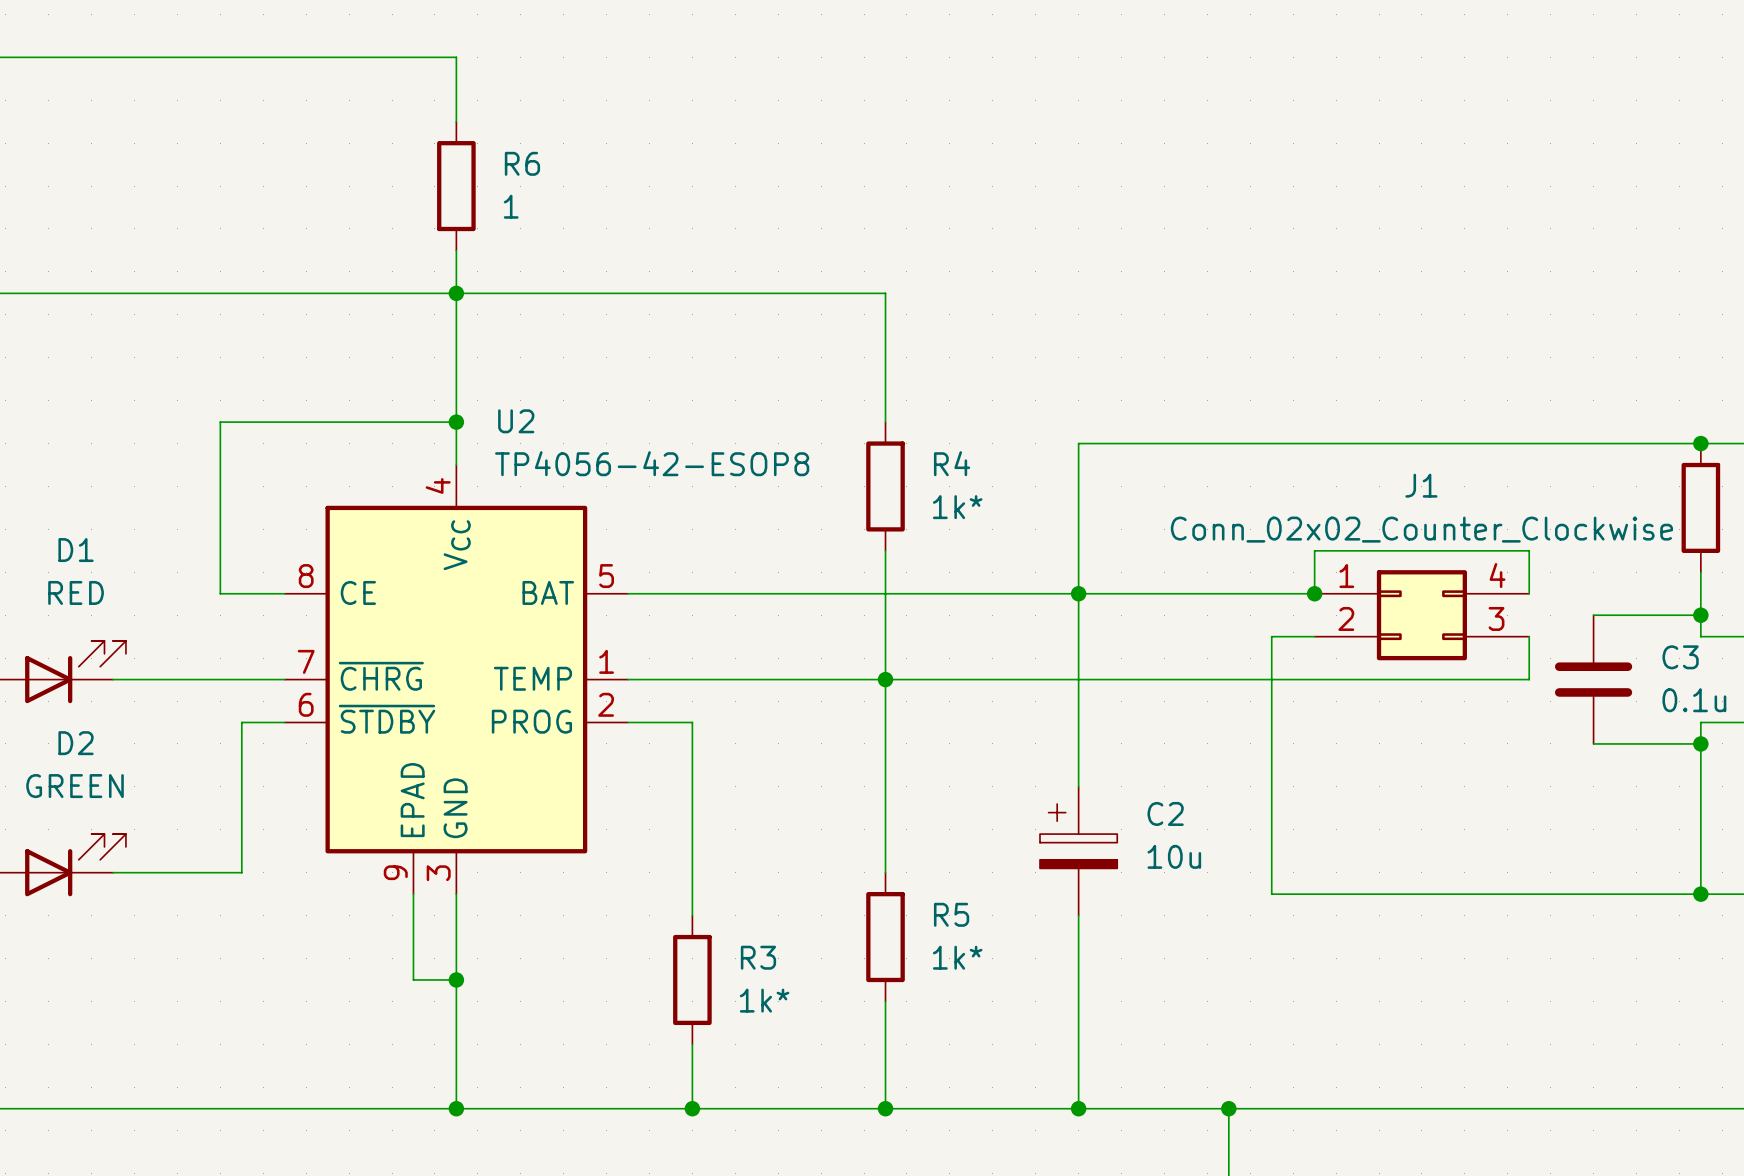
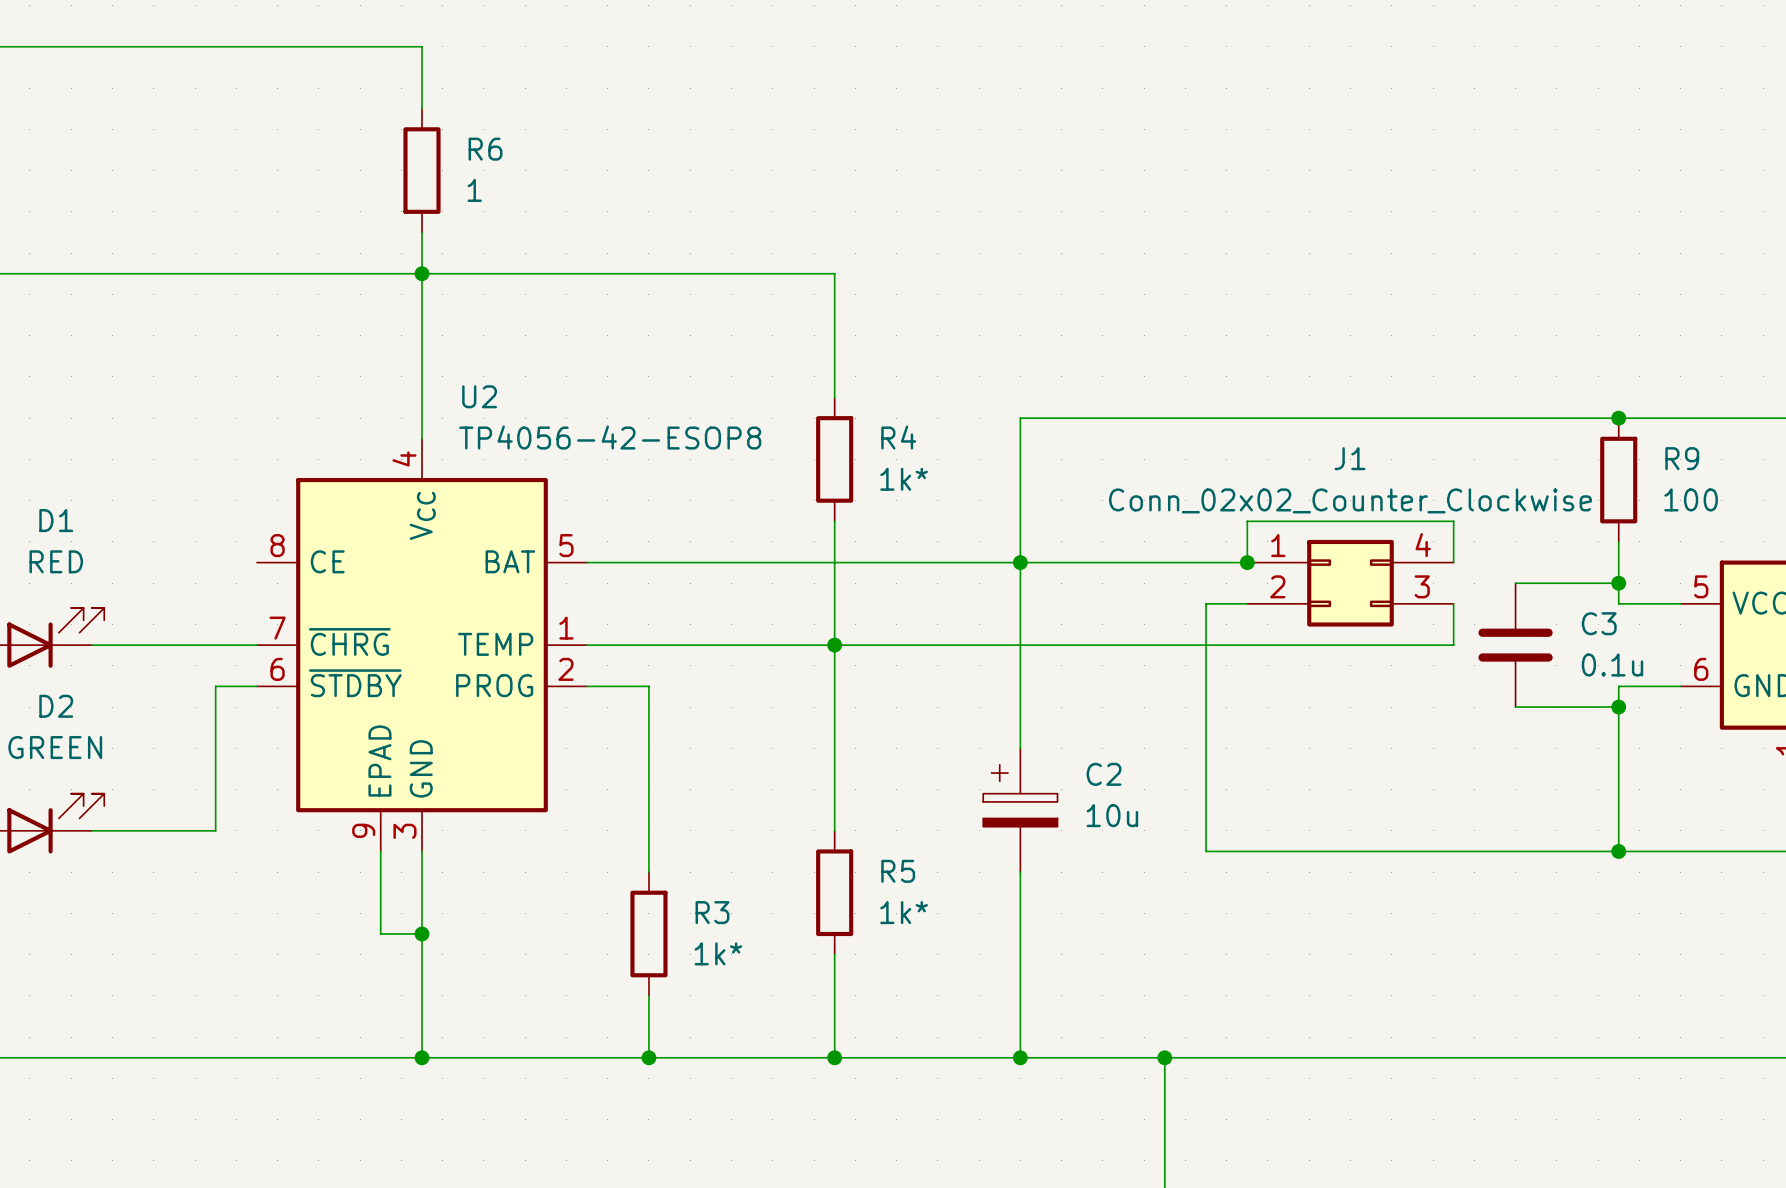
wire: (456, 422) (220, 422) (220, 593) (284, 593) -> none
junction: (456, 422) -> none

